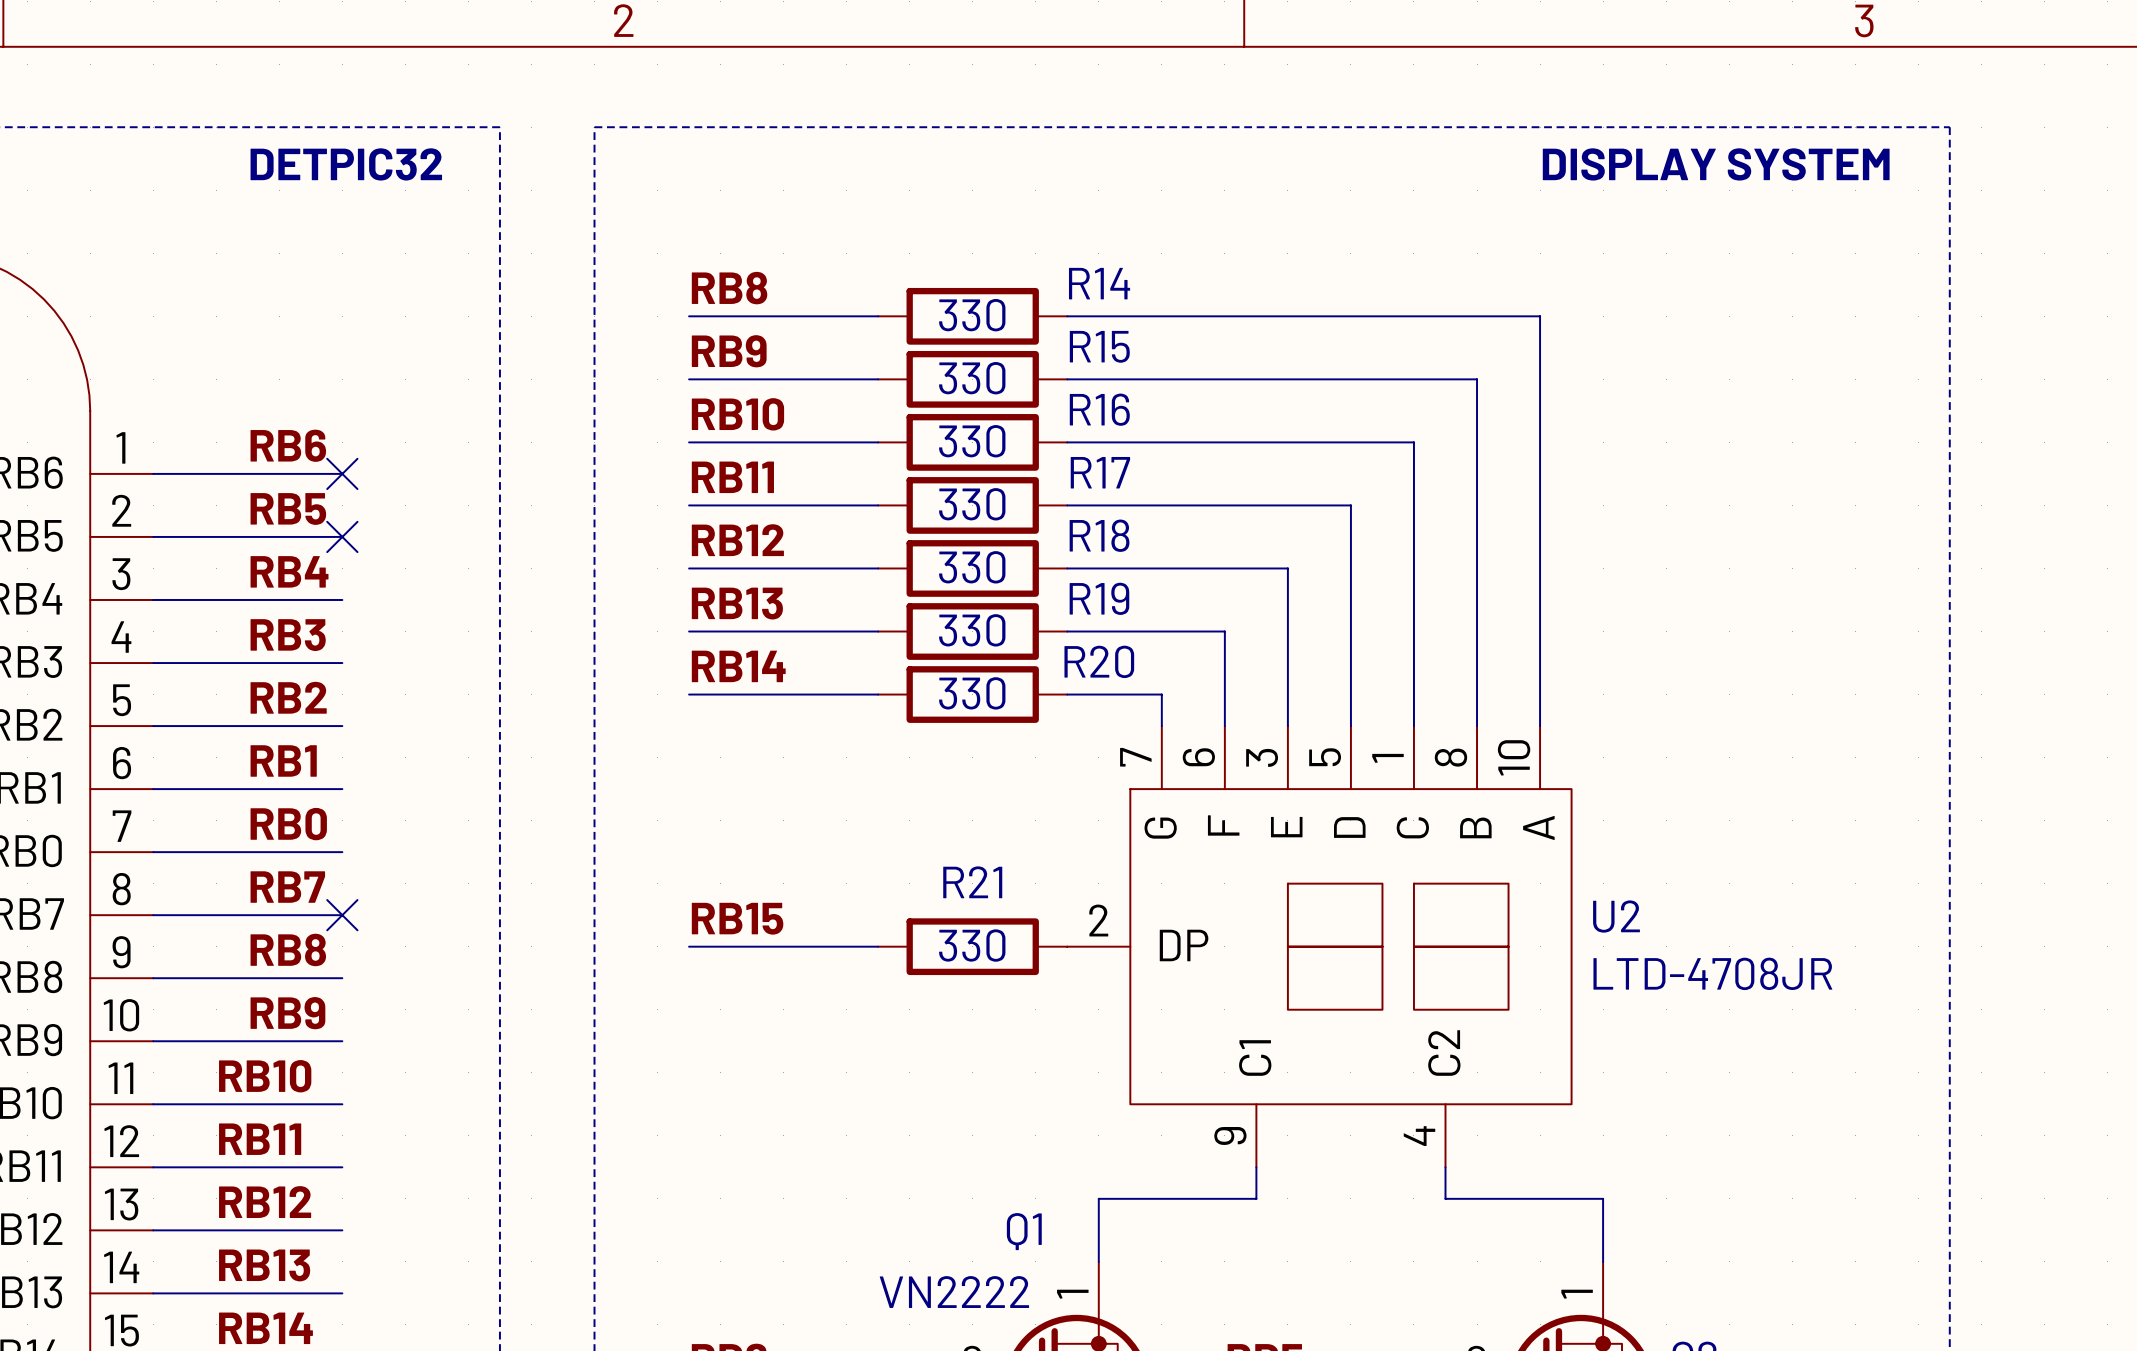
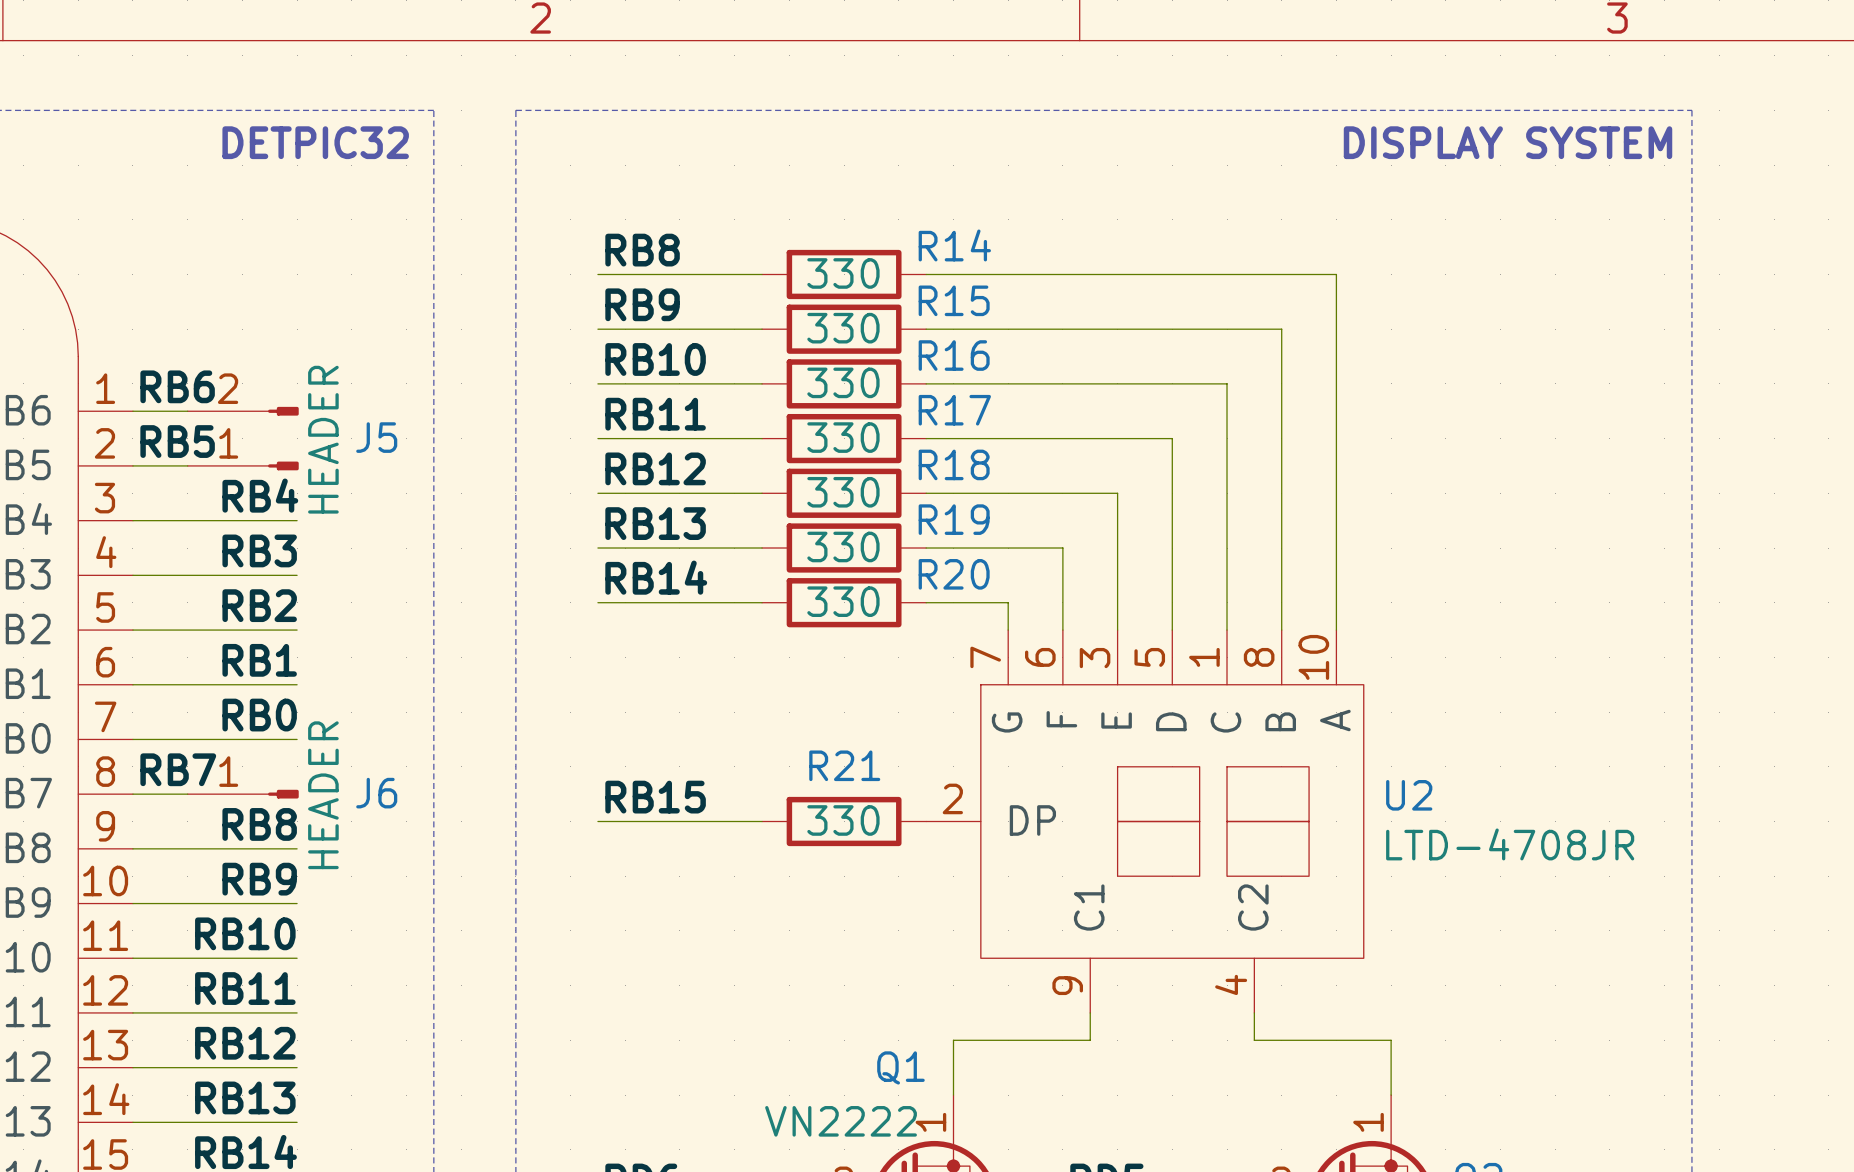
label position: RB6 (288, 445) -> RB6 (177, 386)
no-connect mark: (342, 473) -> none
J5: none -> HEADER (243, 438)
label position: RB5 (288, 508) -> RB5 (177, 441)
no-connect mark: (342, 536) -> none
label position: RB7 (287, 887) -> RB7 (178, 769)
J6: none -> HEADER (243, 794)
no-connect mark: (342, 915) -> none

